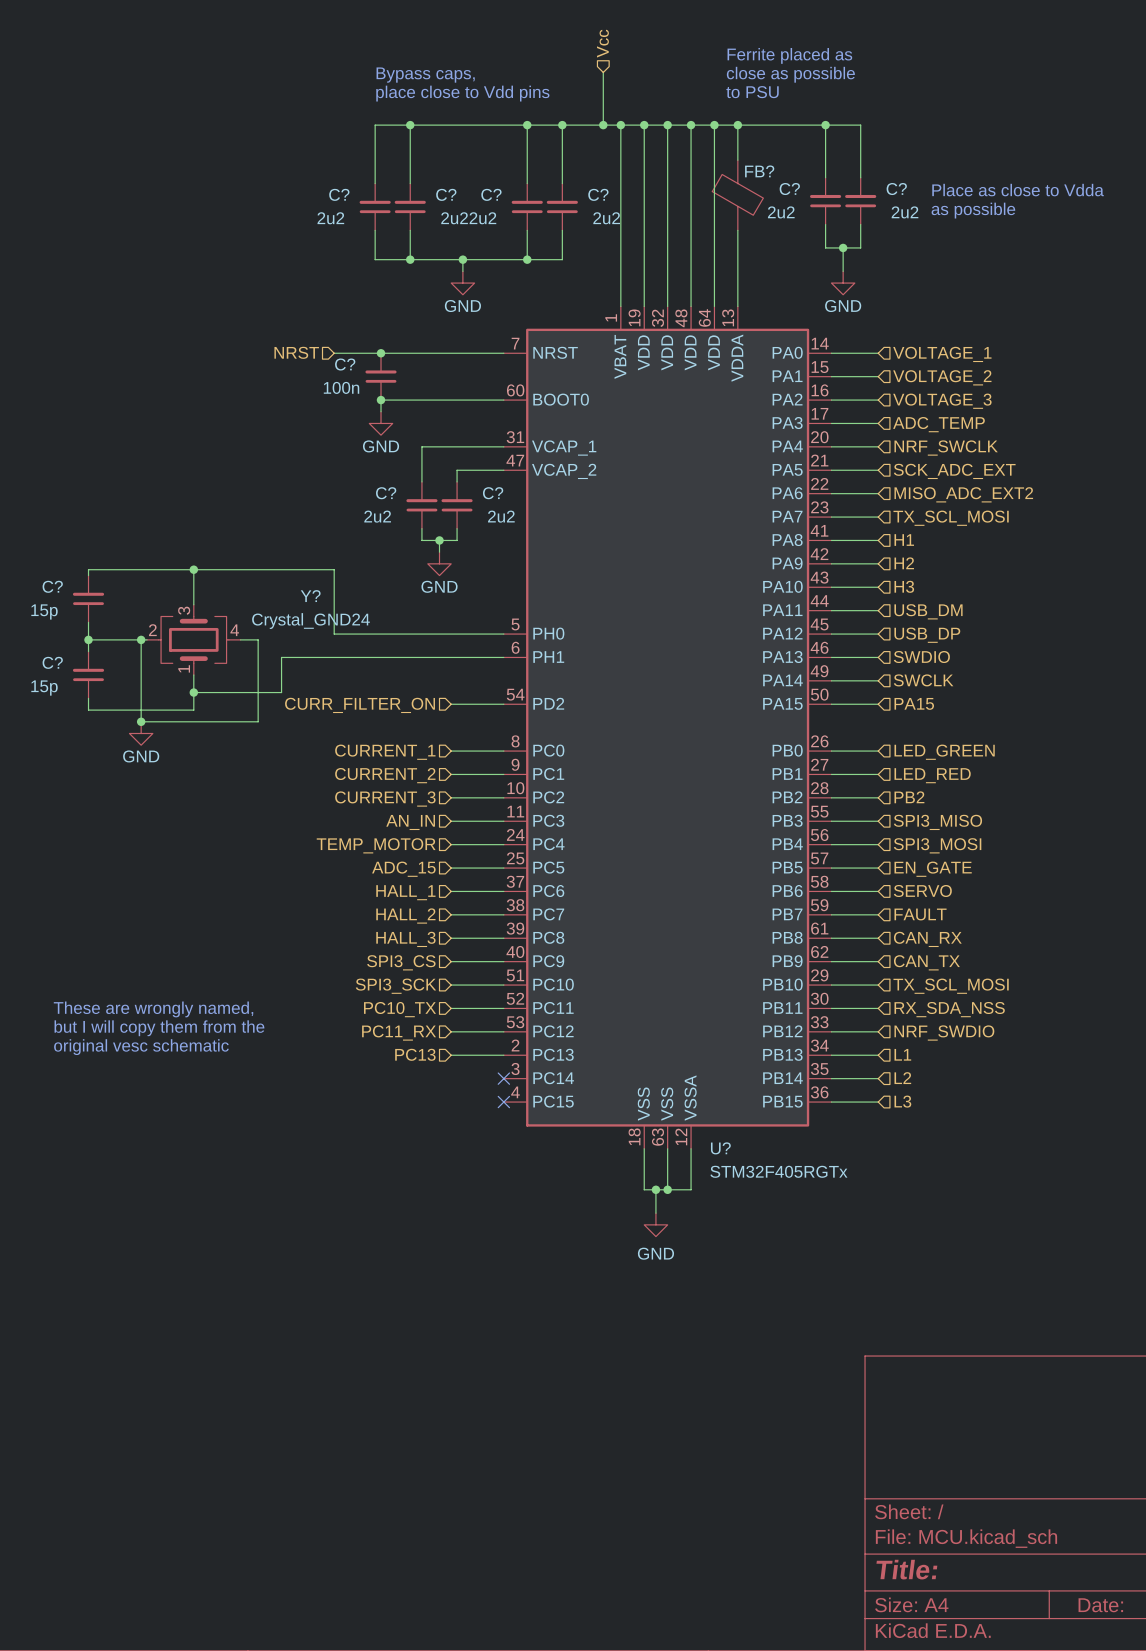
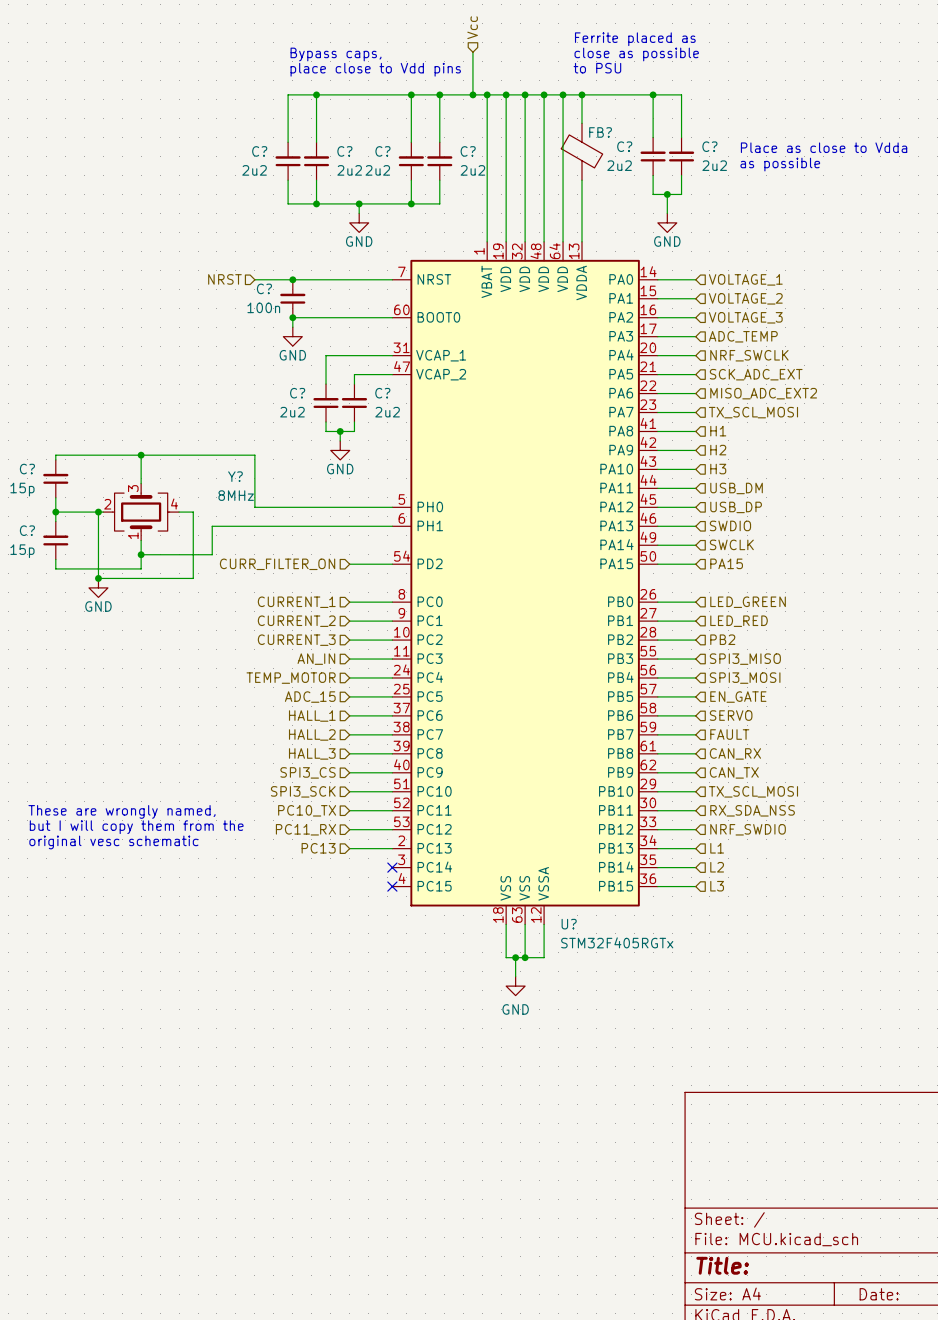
Y? value: Crystal_GND24 (310, 621) -> 8MHz (236, 495)

